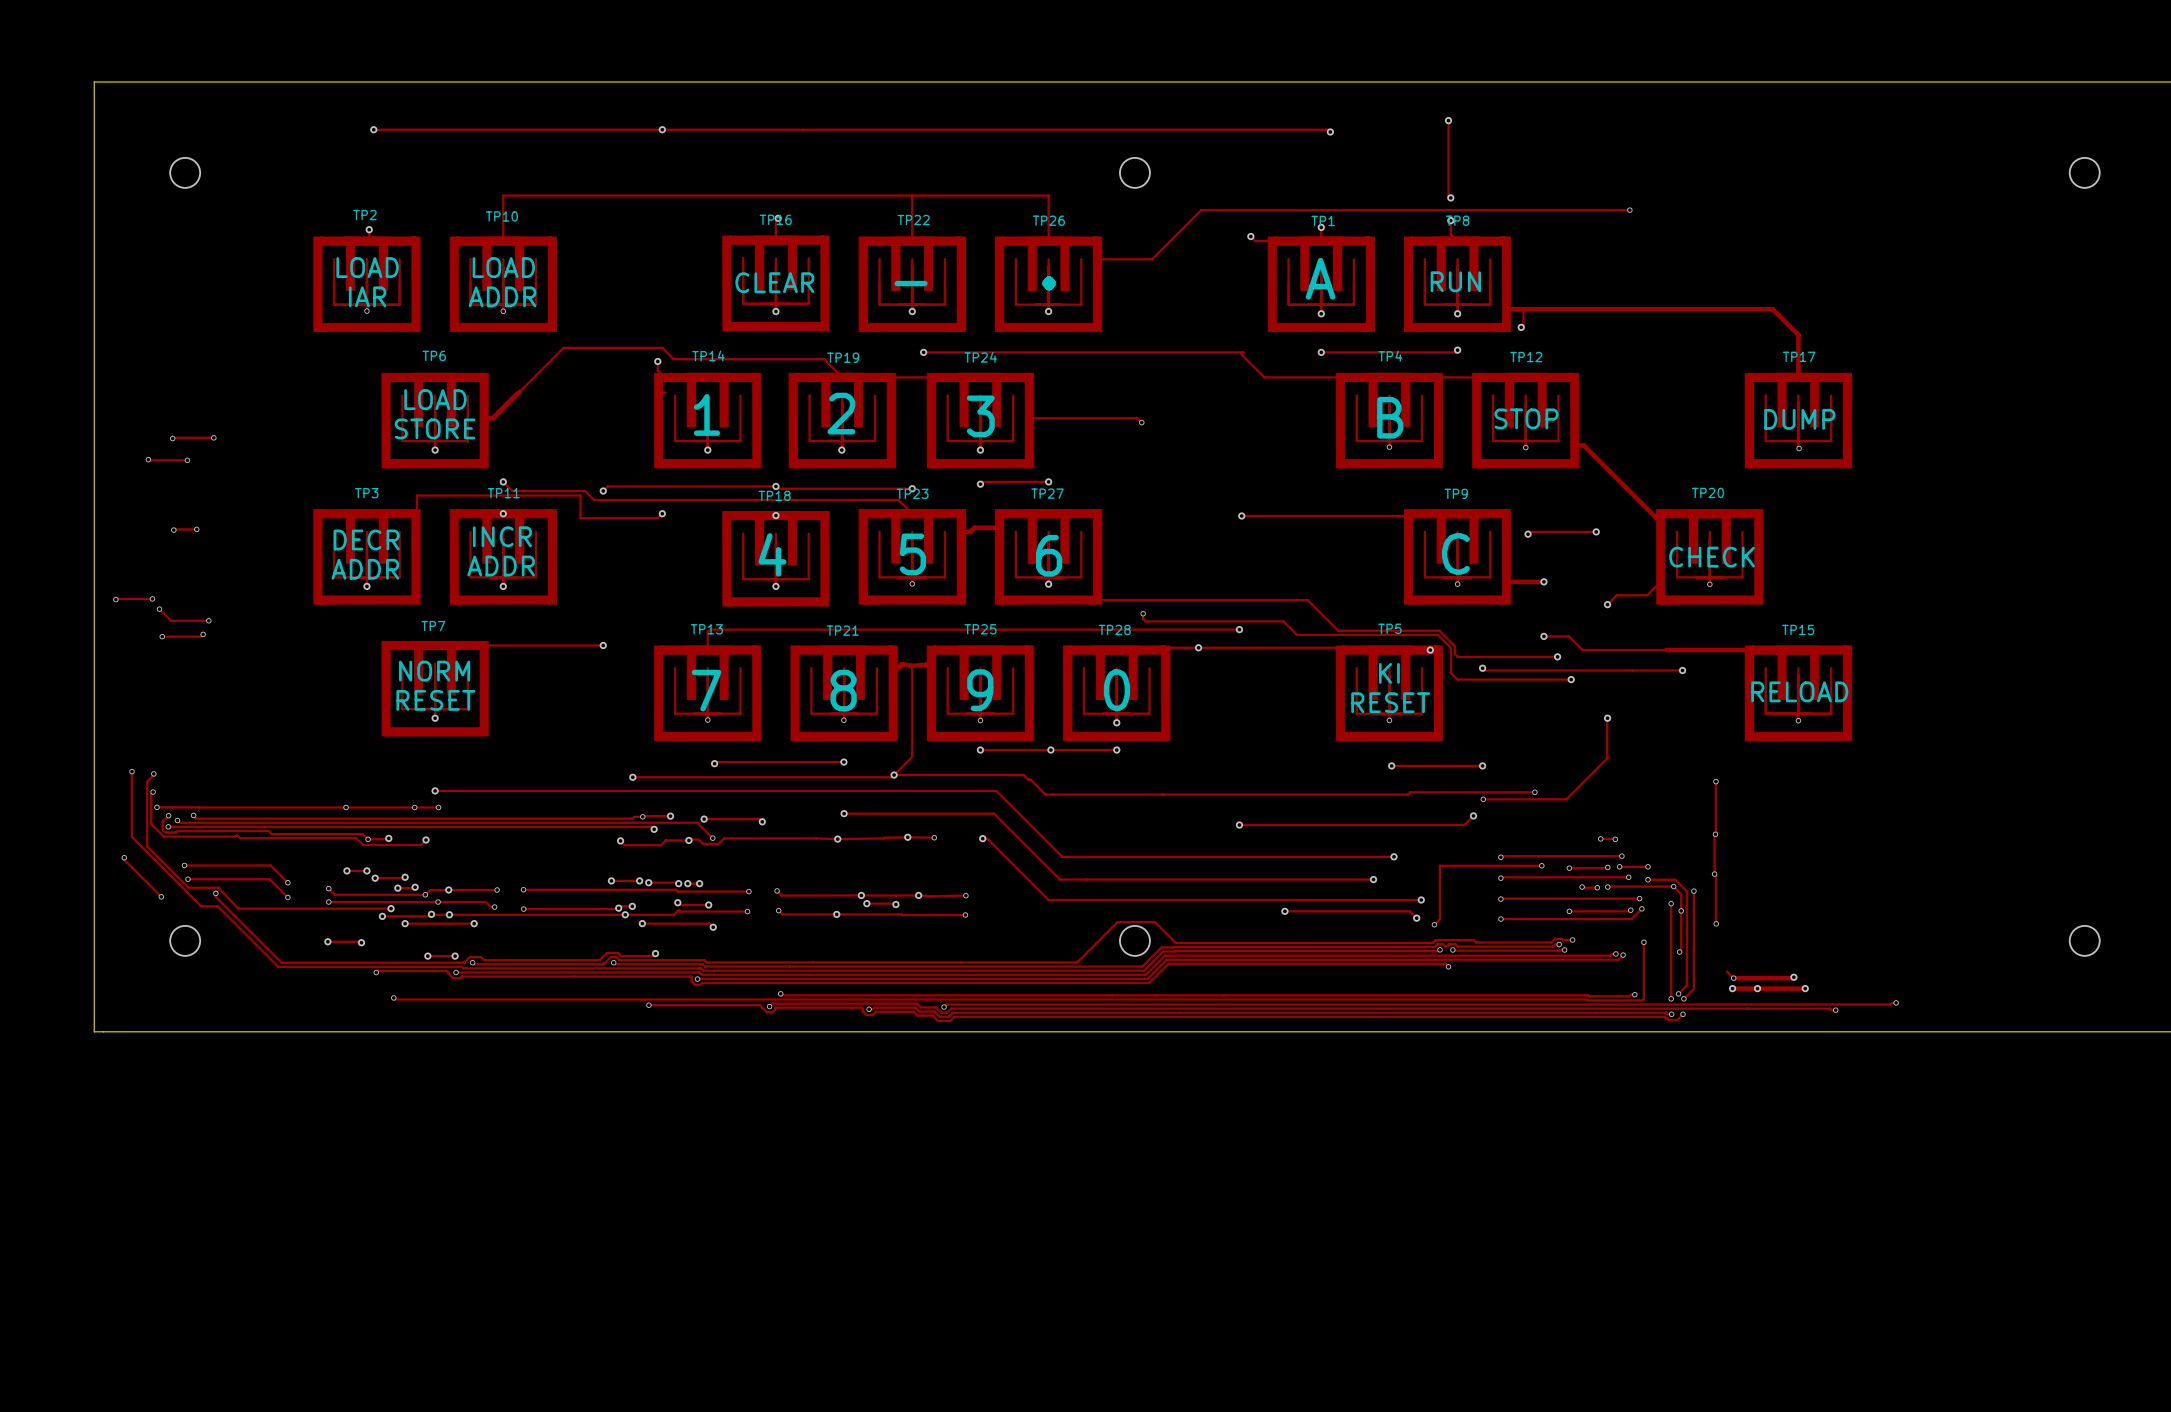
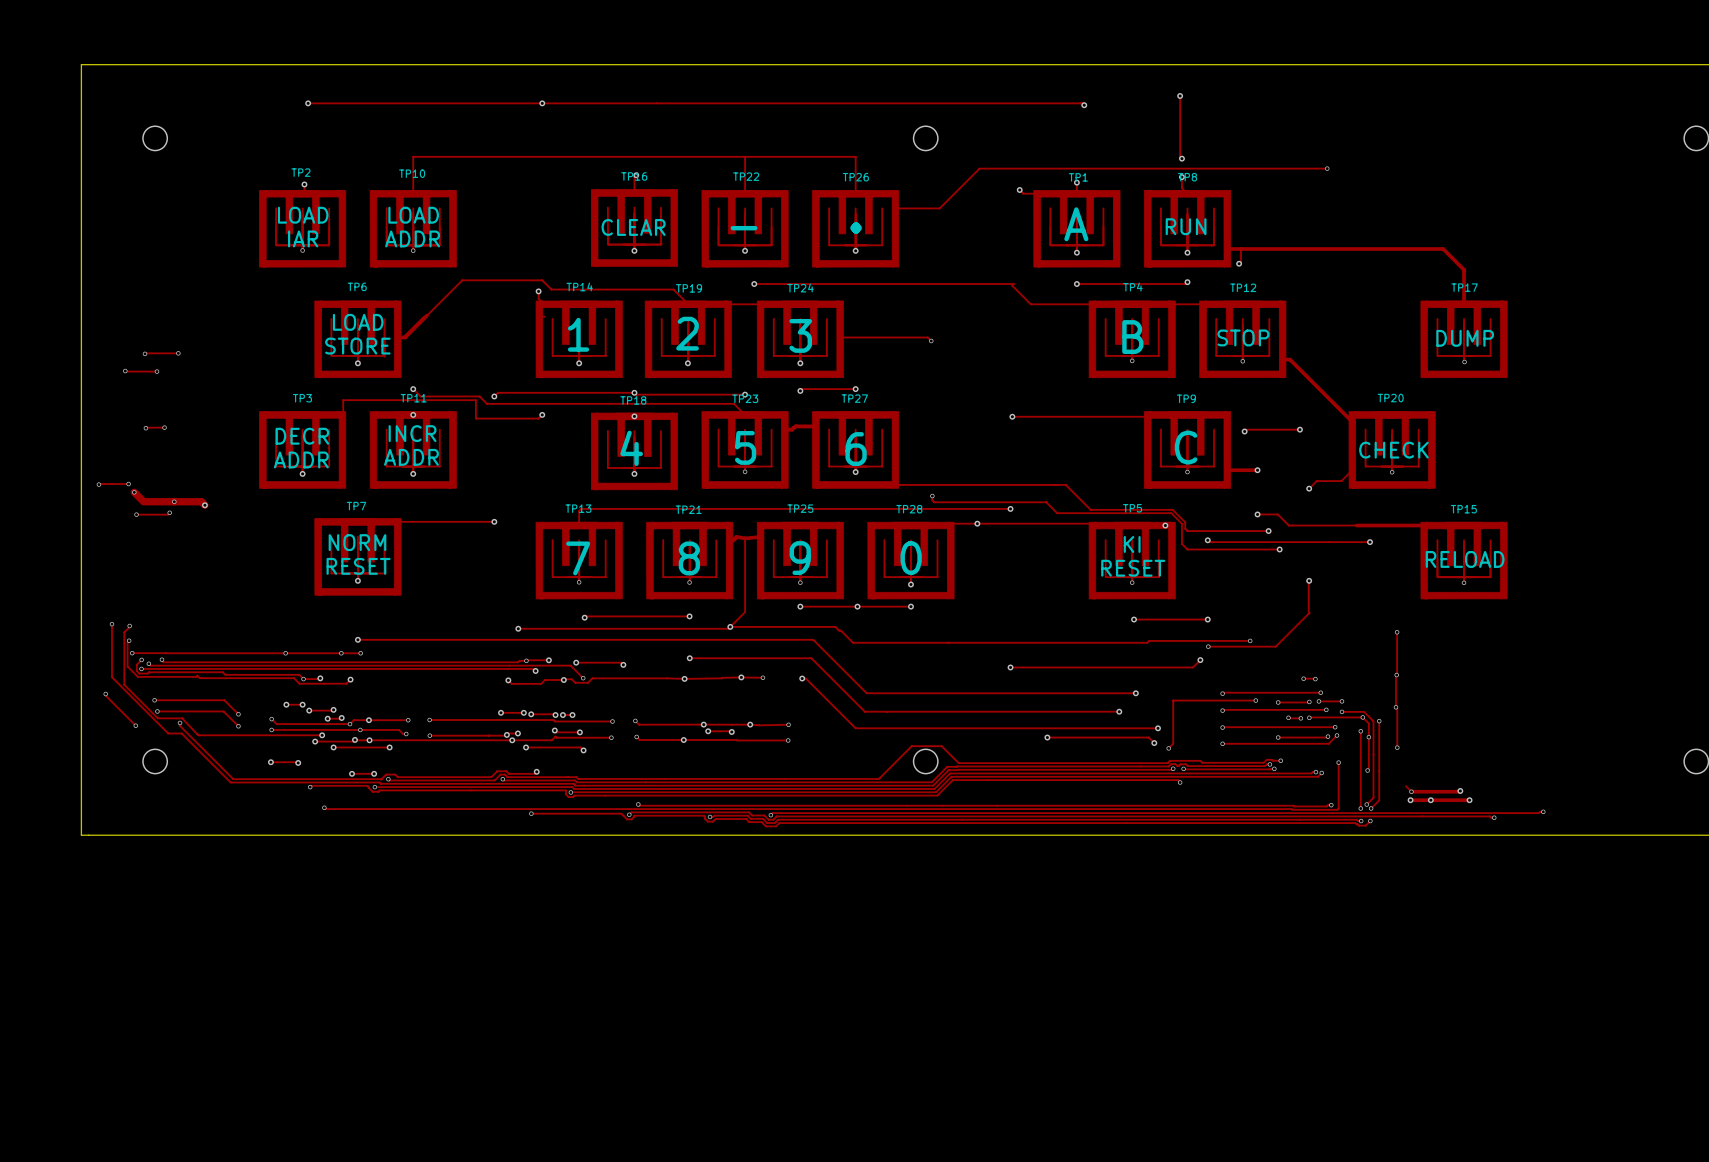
track width: thin (159, 609) (170, 620) -> thick (134, 492) (143, 501)
track width: thin (171, 620) (208, 620) -> thick (144, 501) (174, 501)
track: none -> (174, 501) (201, 501) (204, 505)
via: none -> (204, 505)

